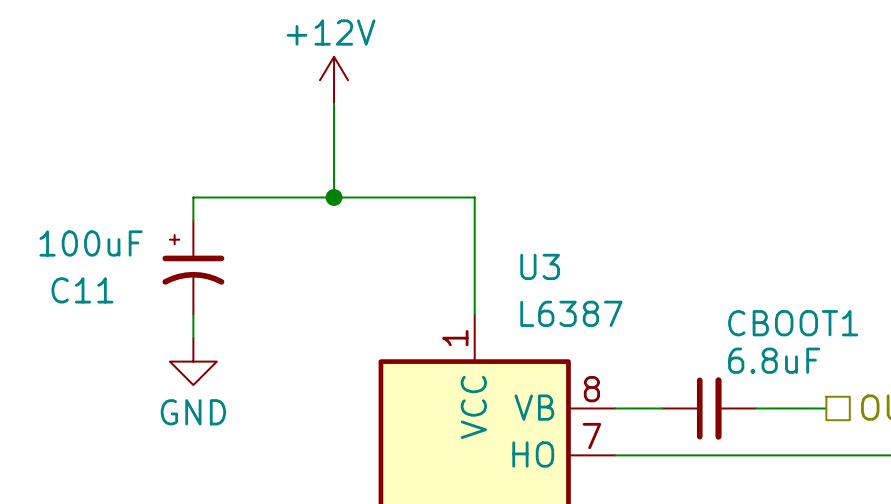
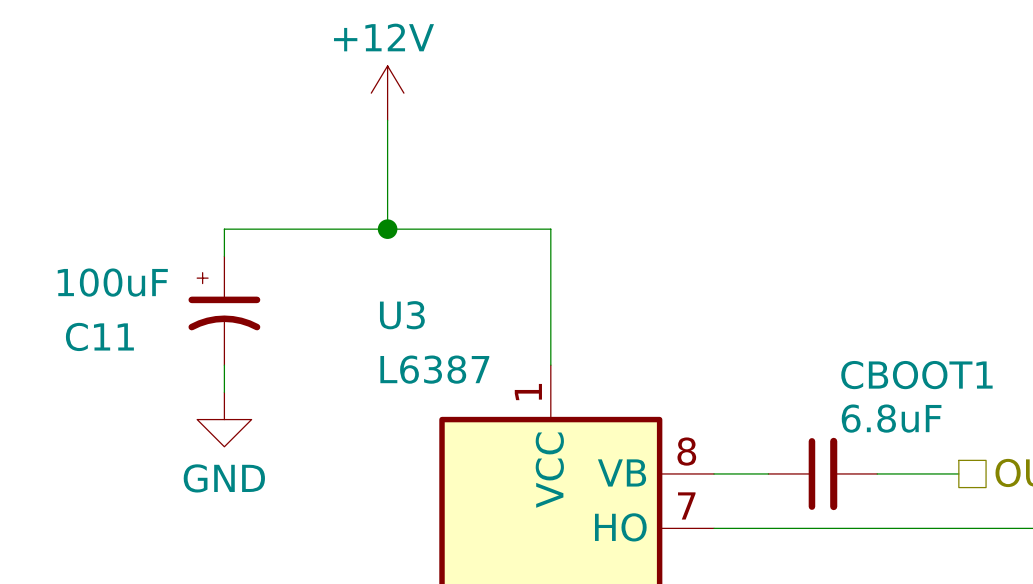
U3 name position: U3 (540, 266) -> U3 (402, 315)
U3 value position: L6387 (571, 313) -> L6387 (434, 369)

